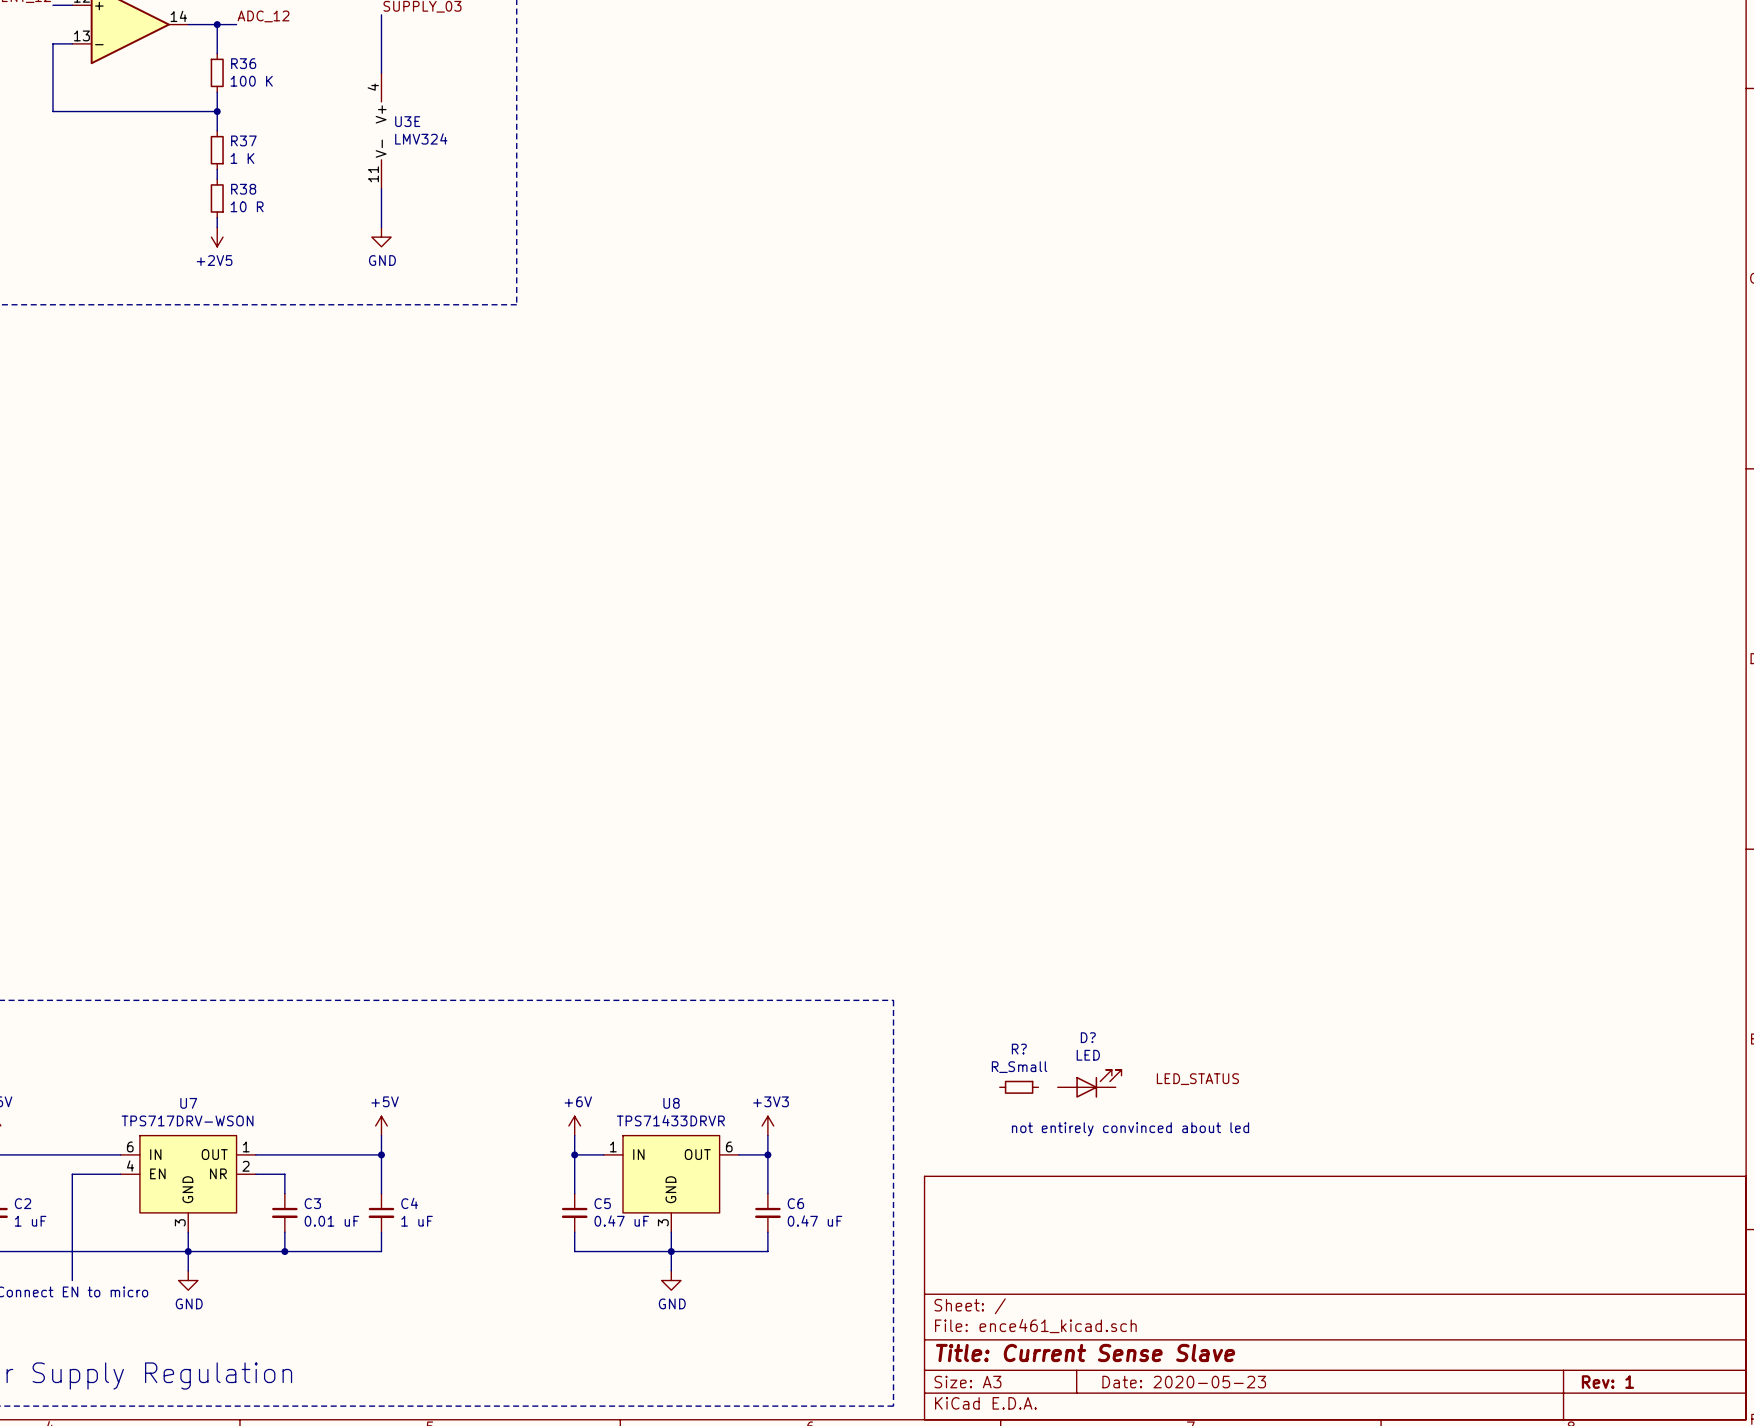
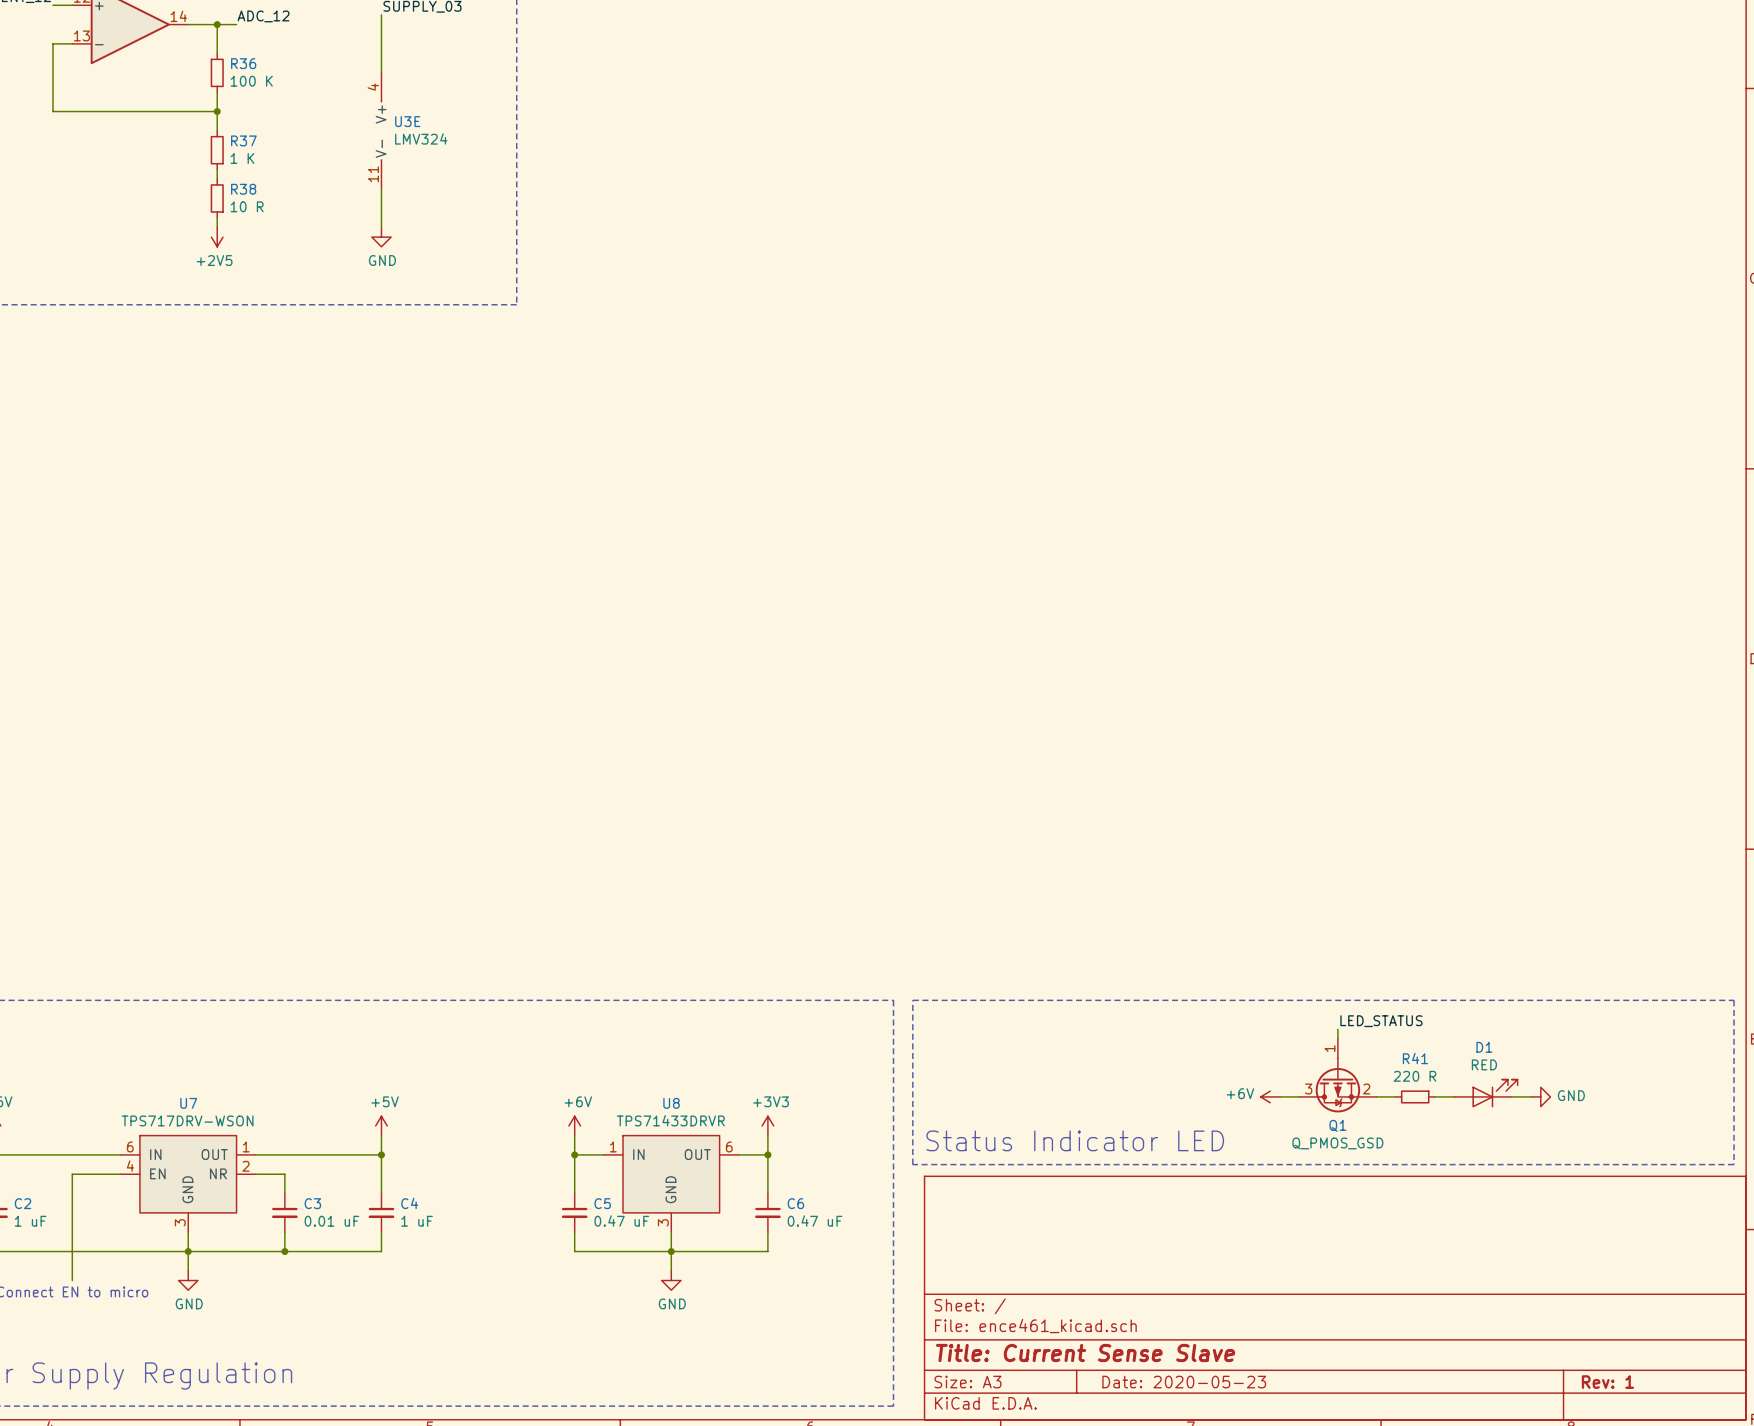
line: none -> (912, 1000) (912, 1164) (1734, 1164) (1734, 1000) (912, 1000)
label: none -> LED_STATUS (1381, 1021)
wire: none -> (1337, 1029) (1337, 1039)
Q1: none -> Q_PMOS_GSD (1337, 1075)
label: LED_STATUS (1197, 1079) -> none
D?: LED (1089, 1083) -> none
R?: R_Small (1019, 1087) -> none
D1: none -> RED (1485, 1093)
power symbol: none -> +6V (1270, 1096)
wire: none -> (1279, 1096) (1299, 1096)
wire: none -> (1376, 1096) (1395, 1096)
R41: none -> 220 R (1415, 1096)
wire: none -> (1434, 1096) (1453, 1096)
wire: none -> (1511, 1096) (1531, 1096)
power symbol: none -> GND (1540, 1096)
text: not entirely convinced about led (1130, 1129) -> none
text: none -> Status Indicator LED (1075, 1140)

